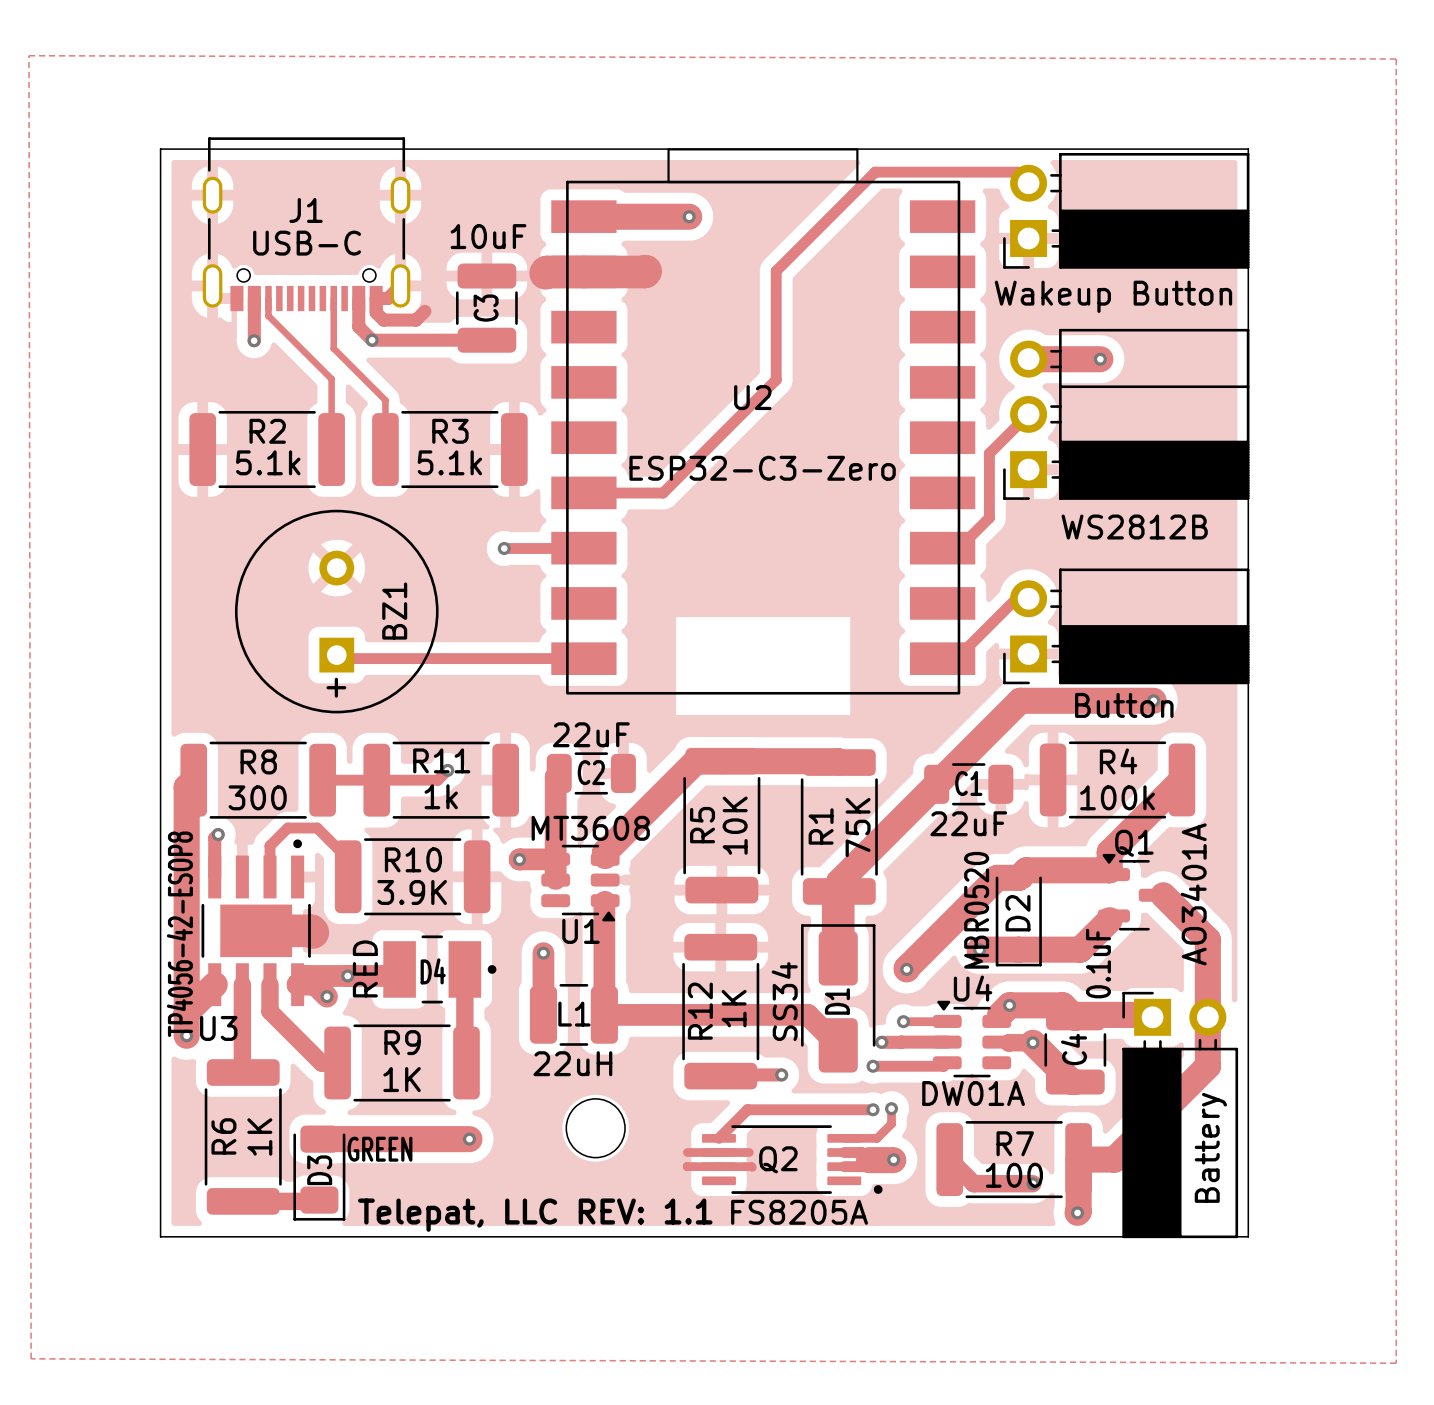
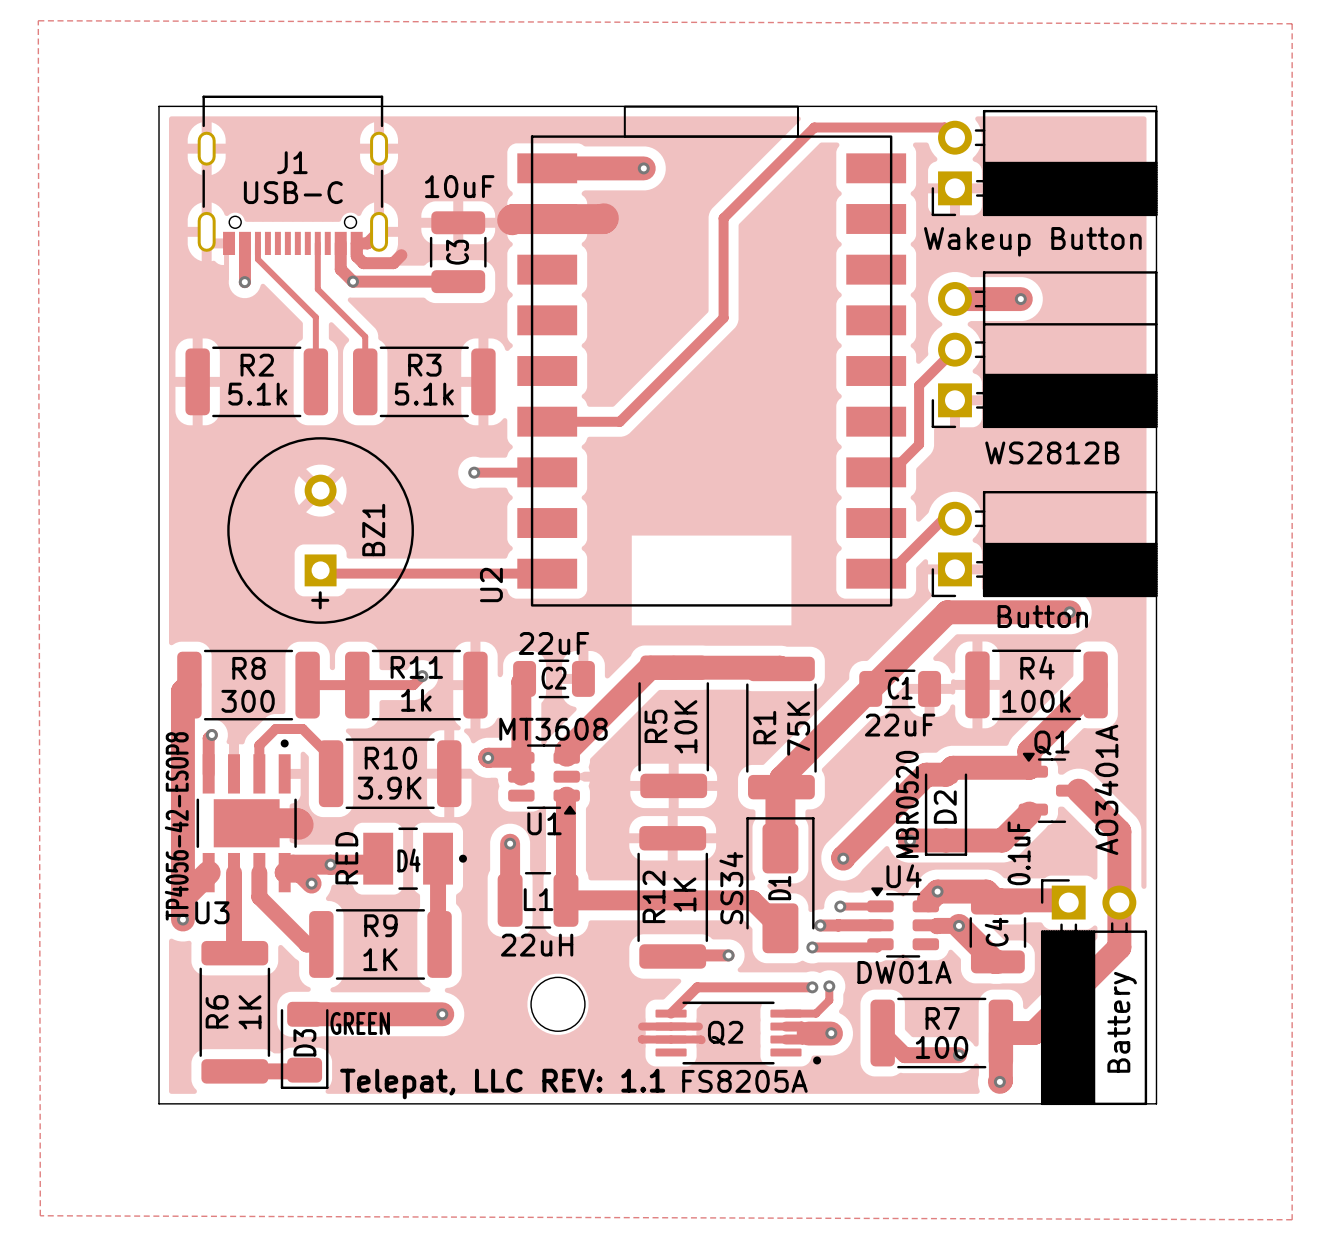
U2 name rotation: 0° (752, 397) -> 90° counterclockwise (491, 584)
U2 name position: U2 (752, 397) -> U2 (491, 584)
U2 value: ESP32-C3-Zero (762, 468) -> none

